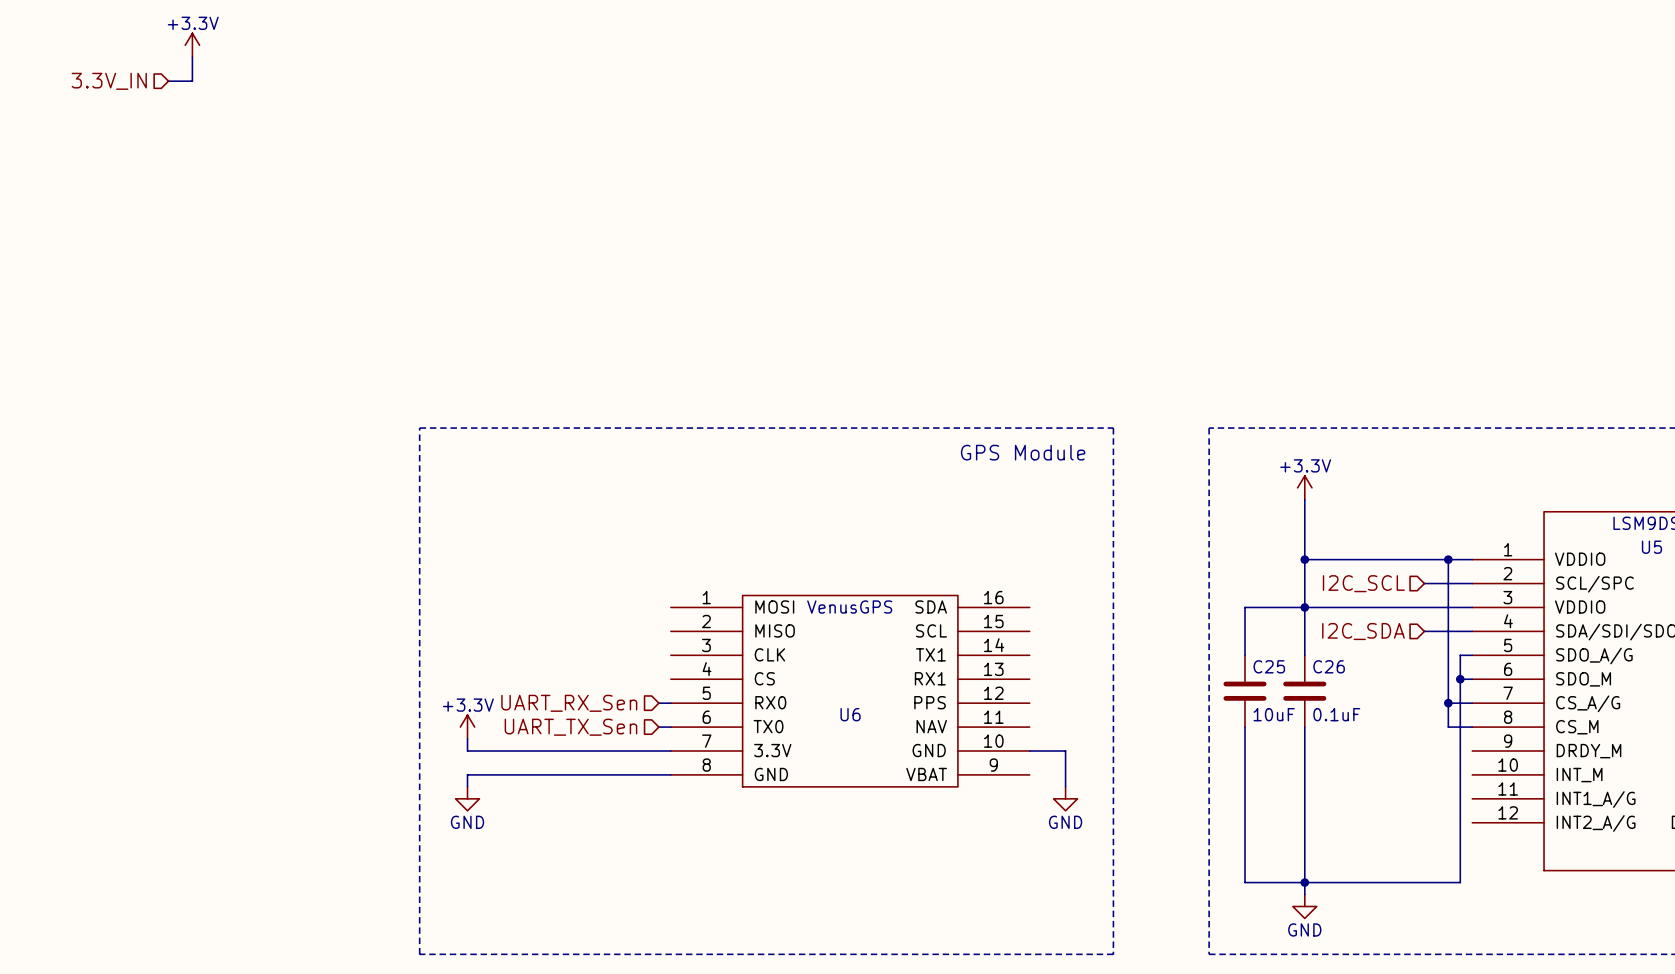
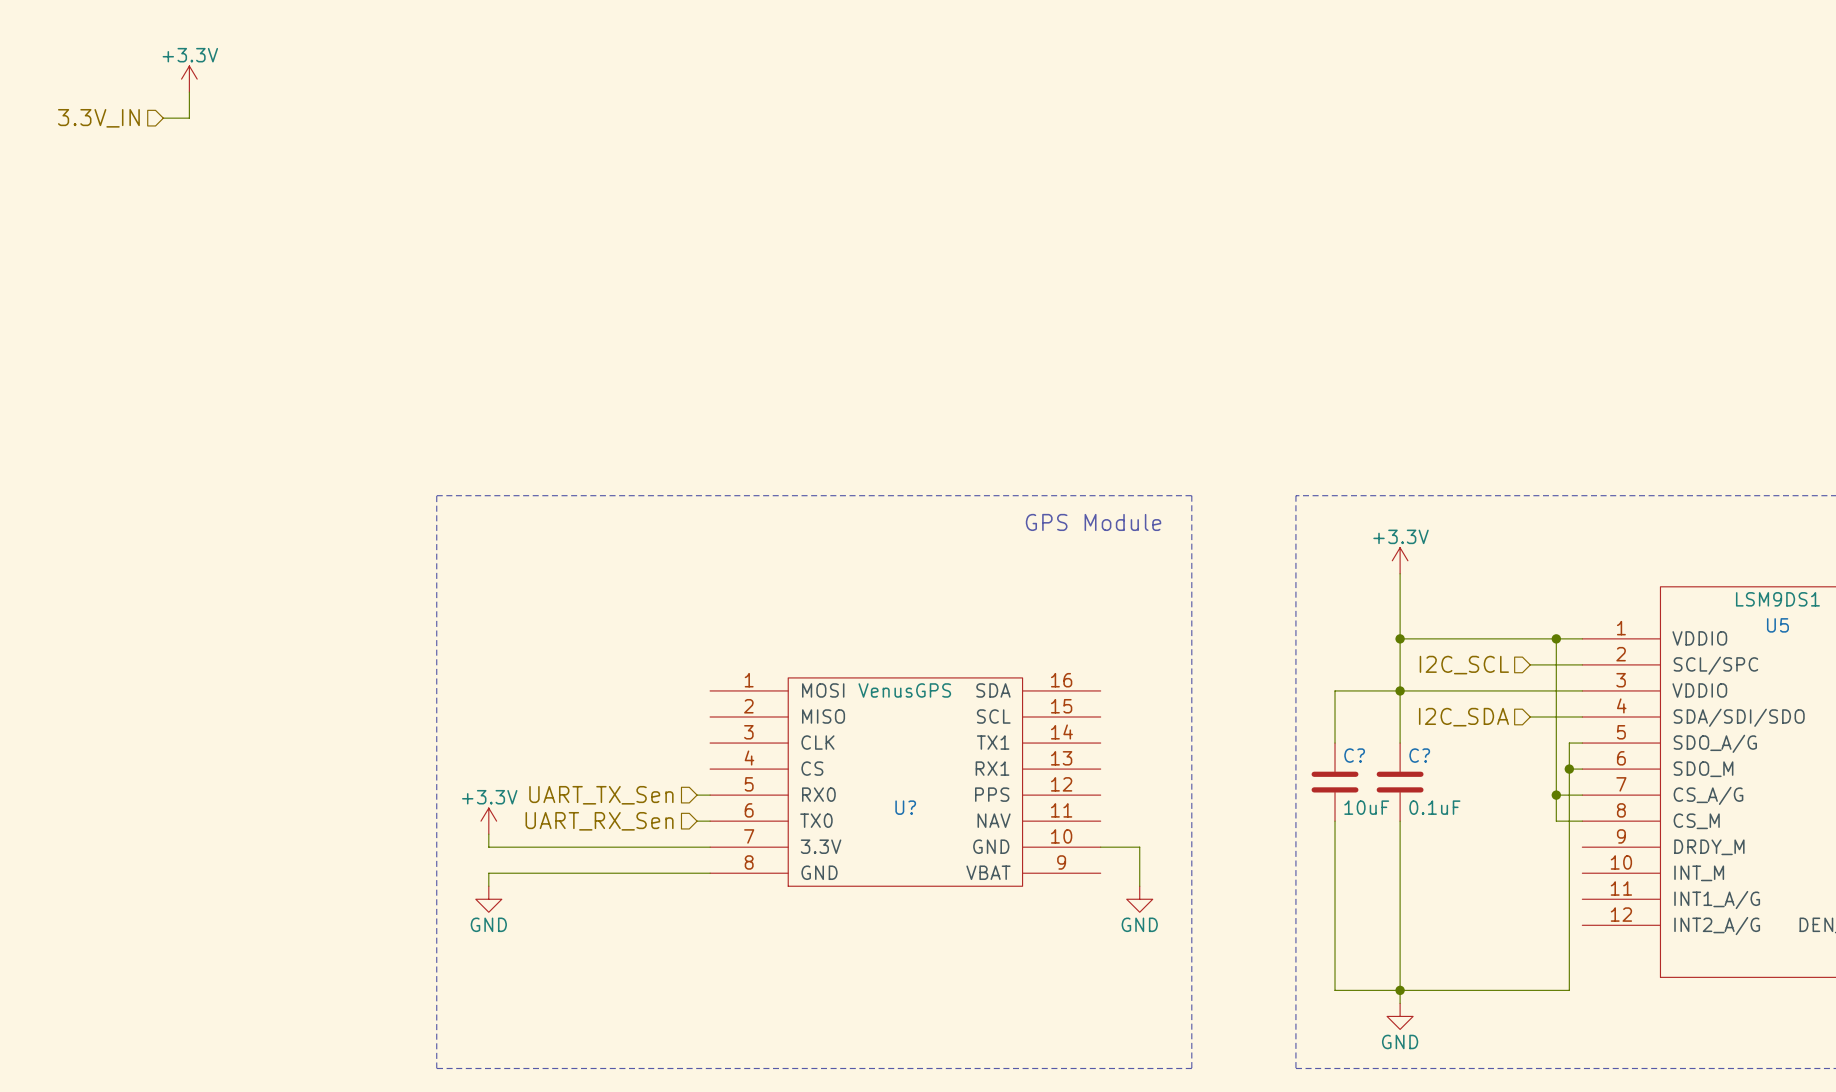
C25 name: C25 (1269, 666) -> C? (1354, 755)
C26 name: C26 (1329, 666) -> C? (1419, 755)
hierarchical label: UART_RX_Sen (569, 703) -> UART_TX_Sen (601, 795)
U6 name: U6 (850, 714) -> U? (905, 807)
hierarchical label: UART_TX_Sen (570, 727) -> UART_RX_Sen (599, 821)

